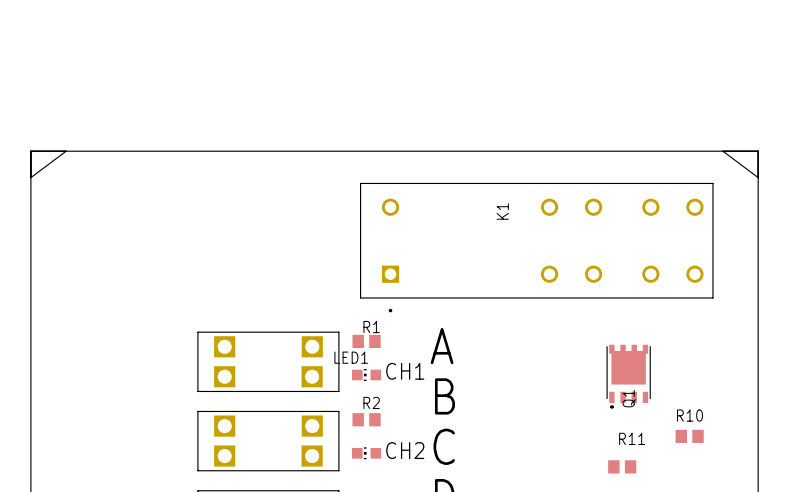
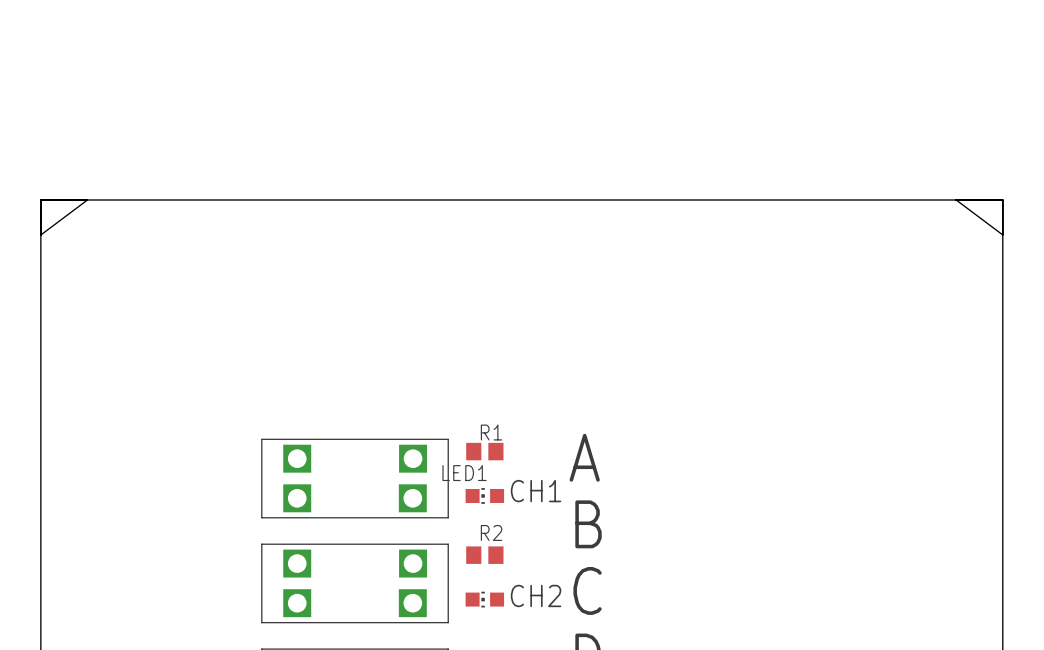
K1: (536, 247) -> none
Q1: (628, 376) -> none
R10: (689, 436) -> none
R11: (622, 466) -> none

